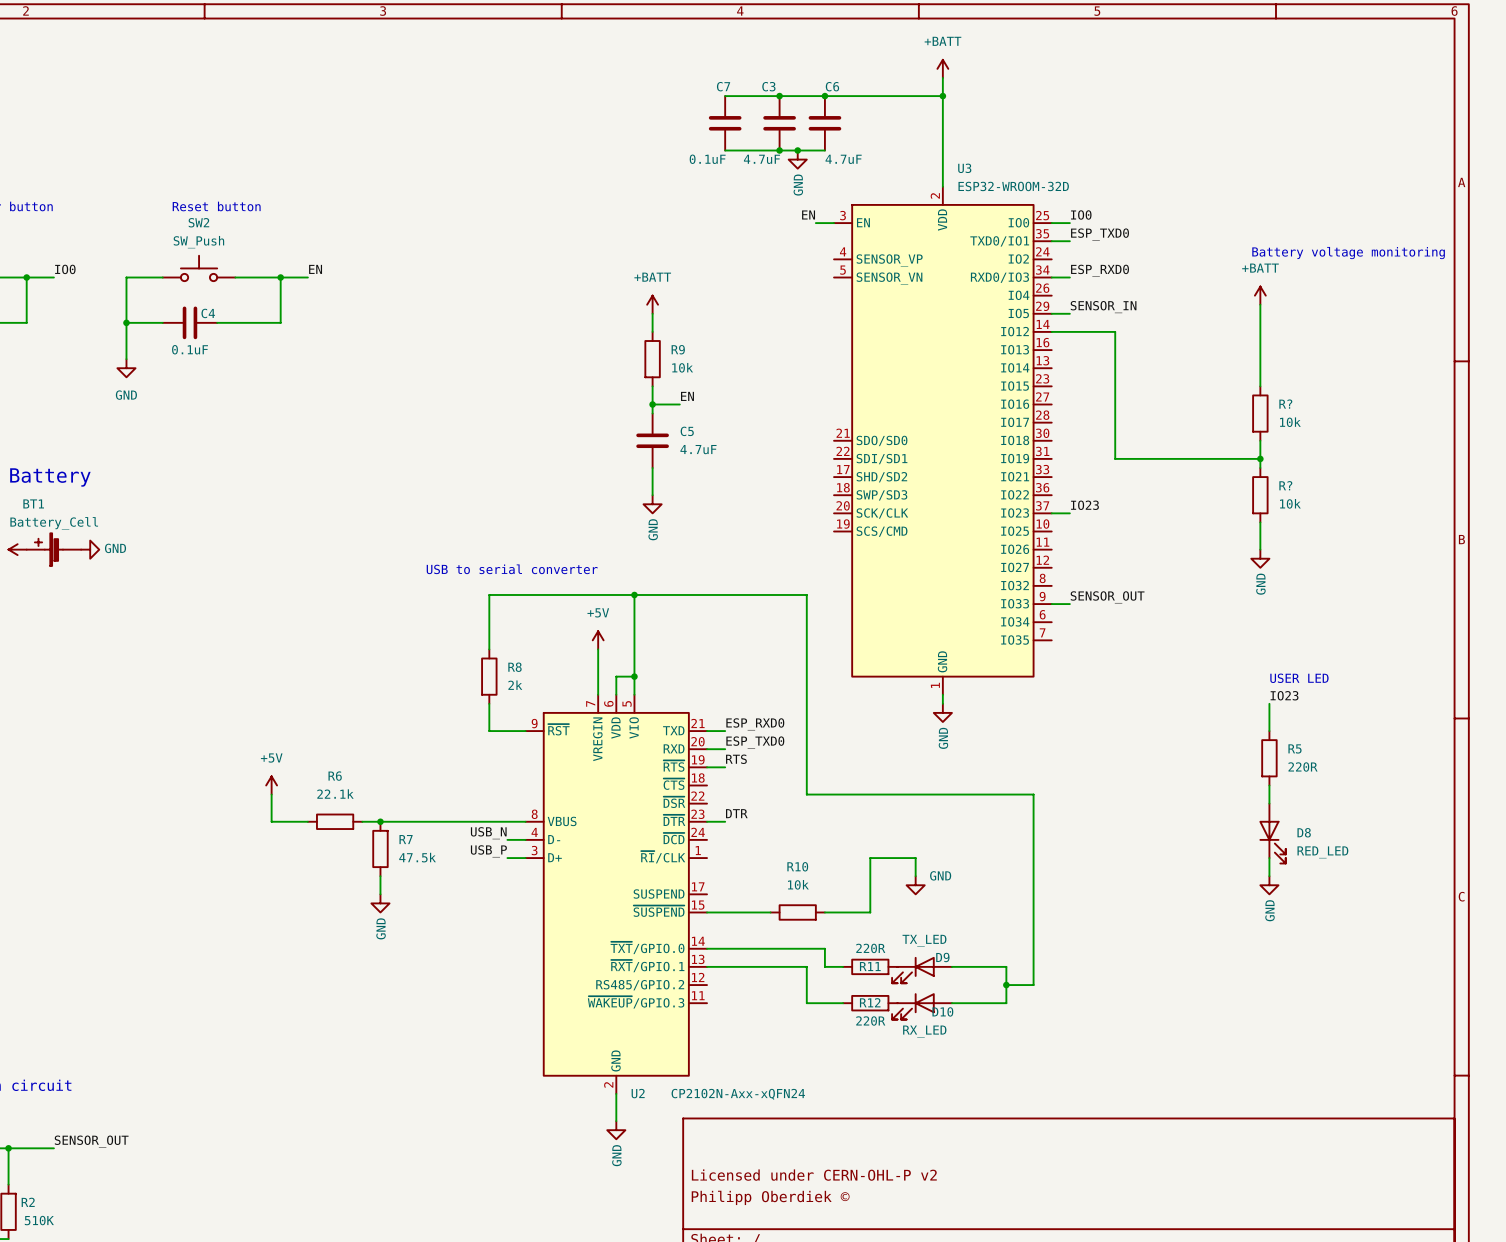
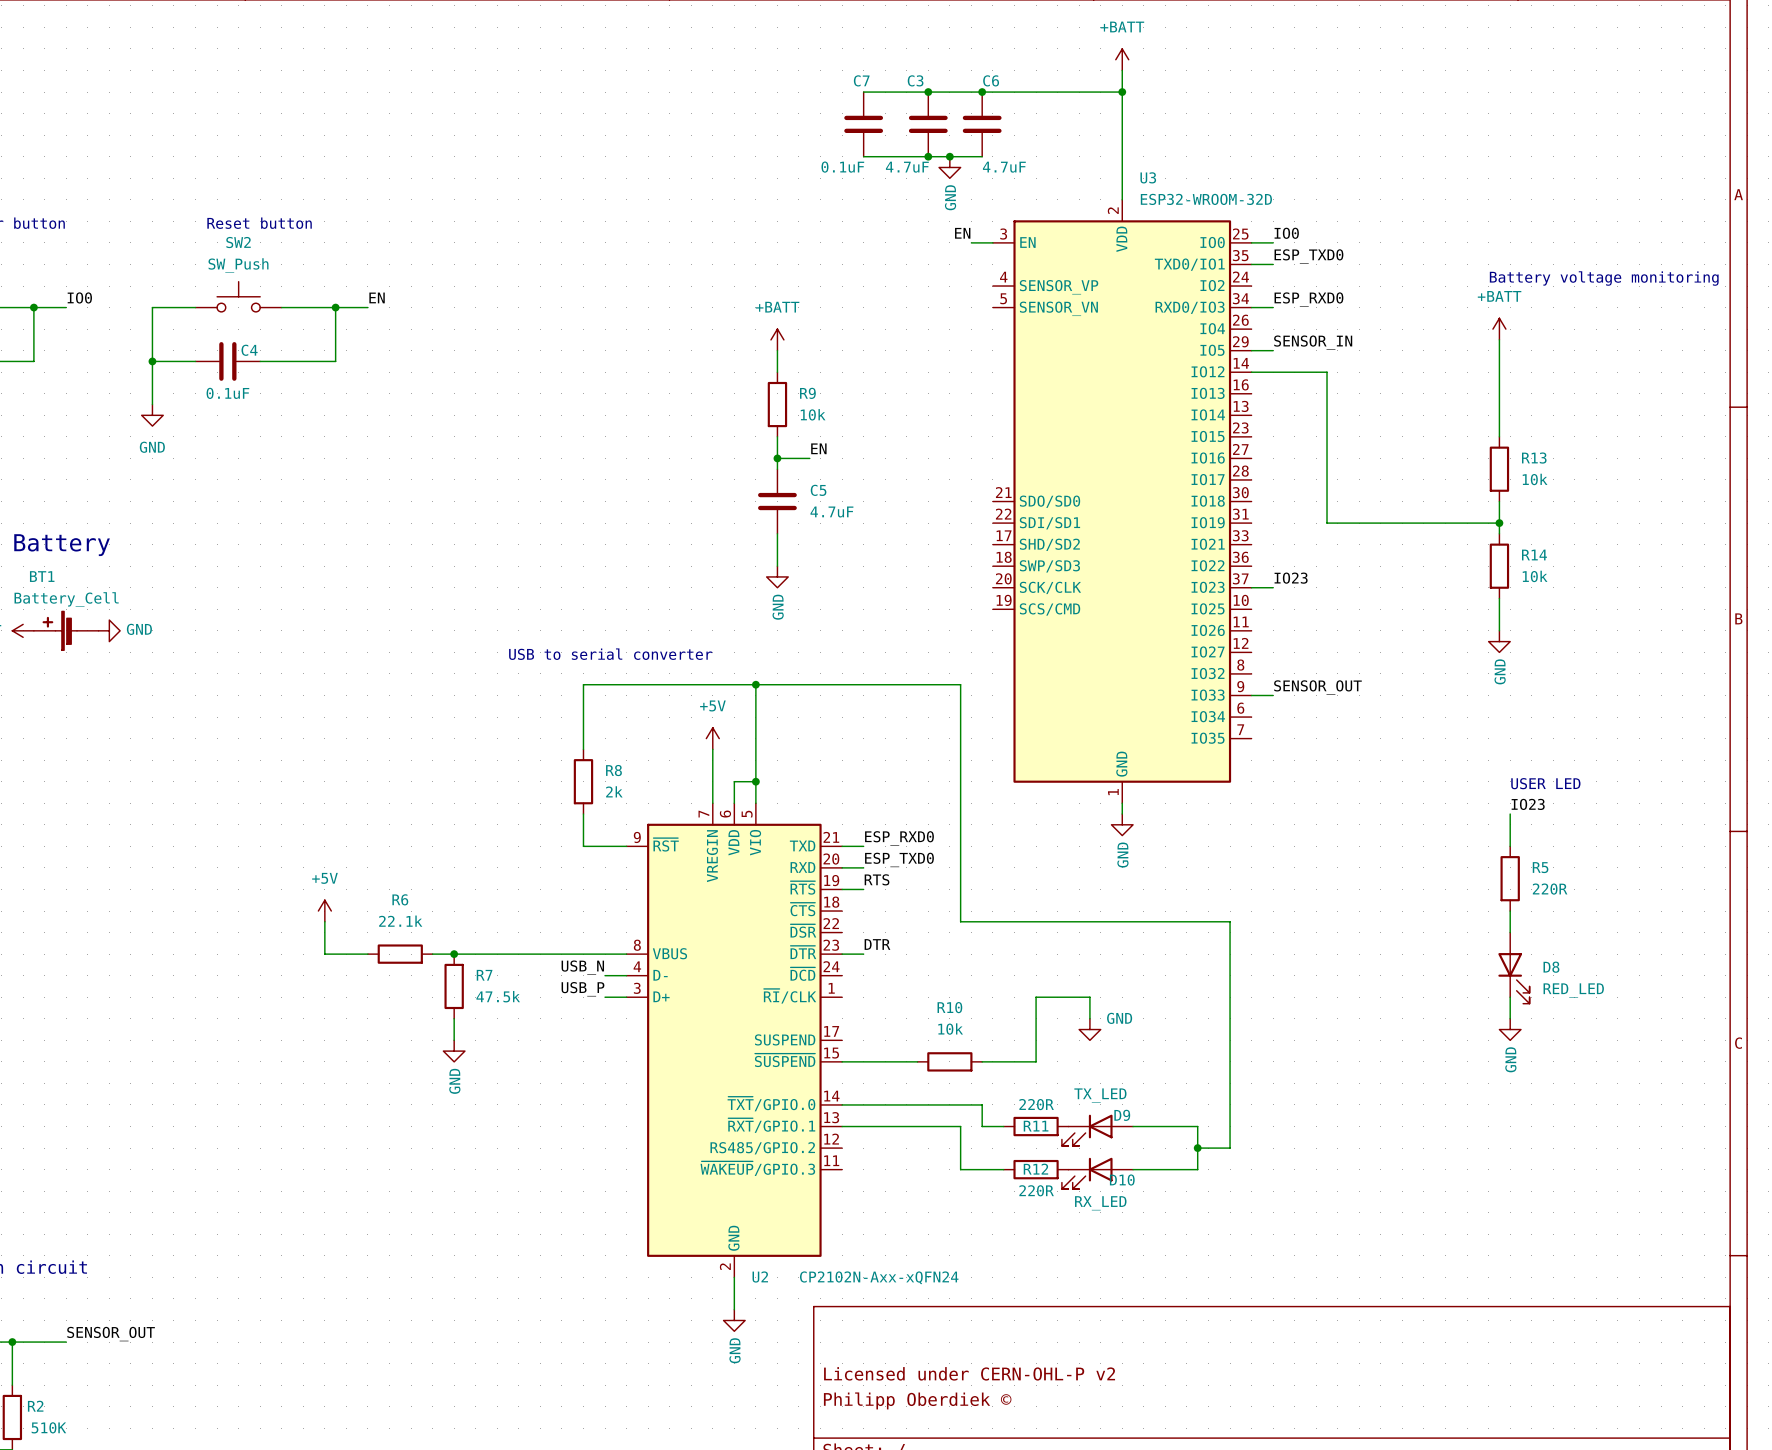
R? name: R? (1285, 404) -> R13 (1534, 458)
R? name: R? (1285, 485) -> R14 (1534, 555)

